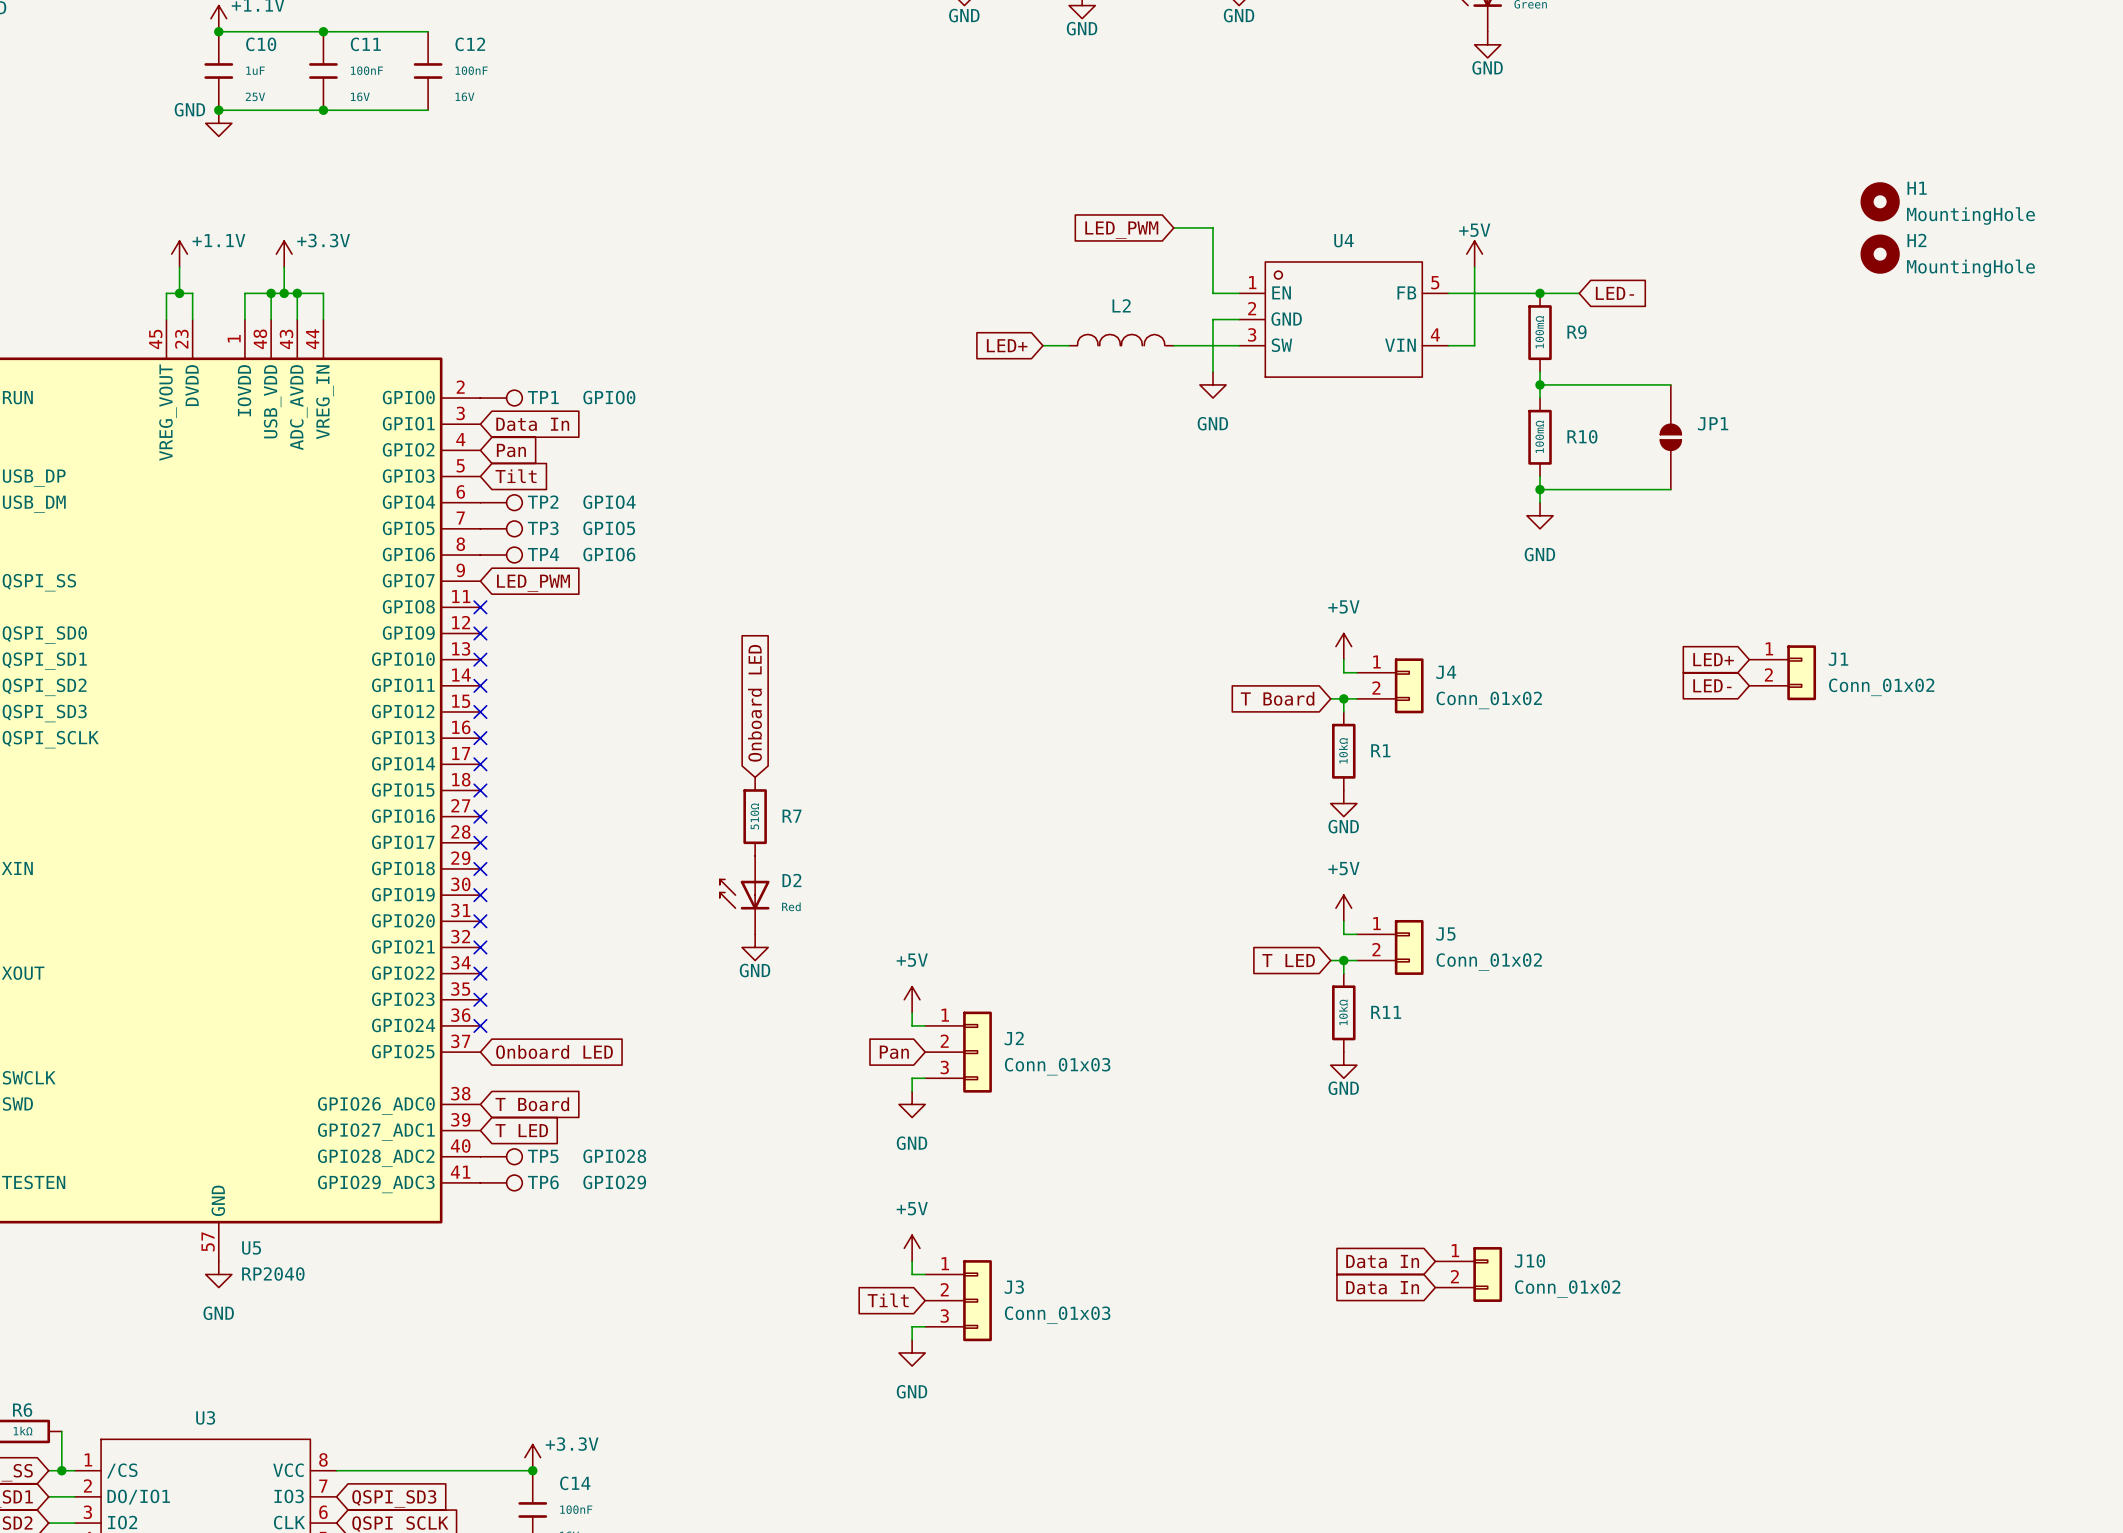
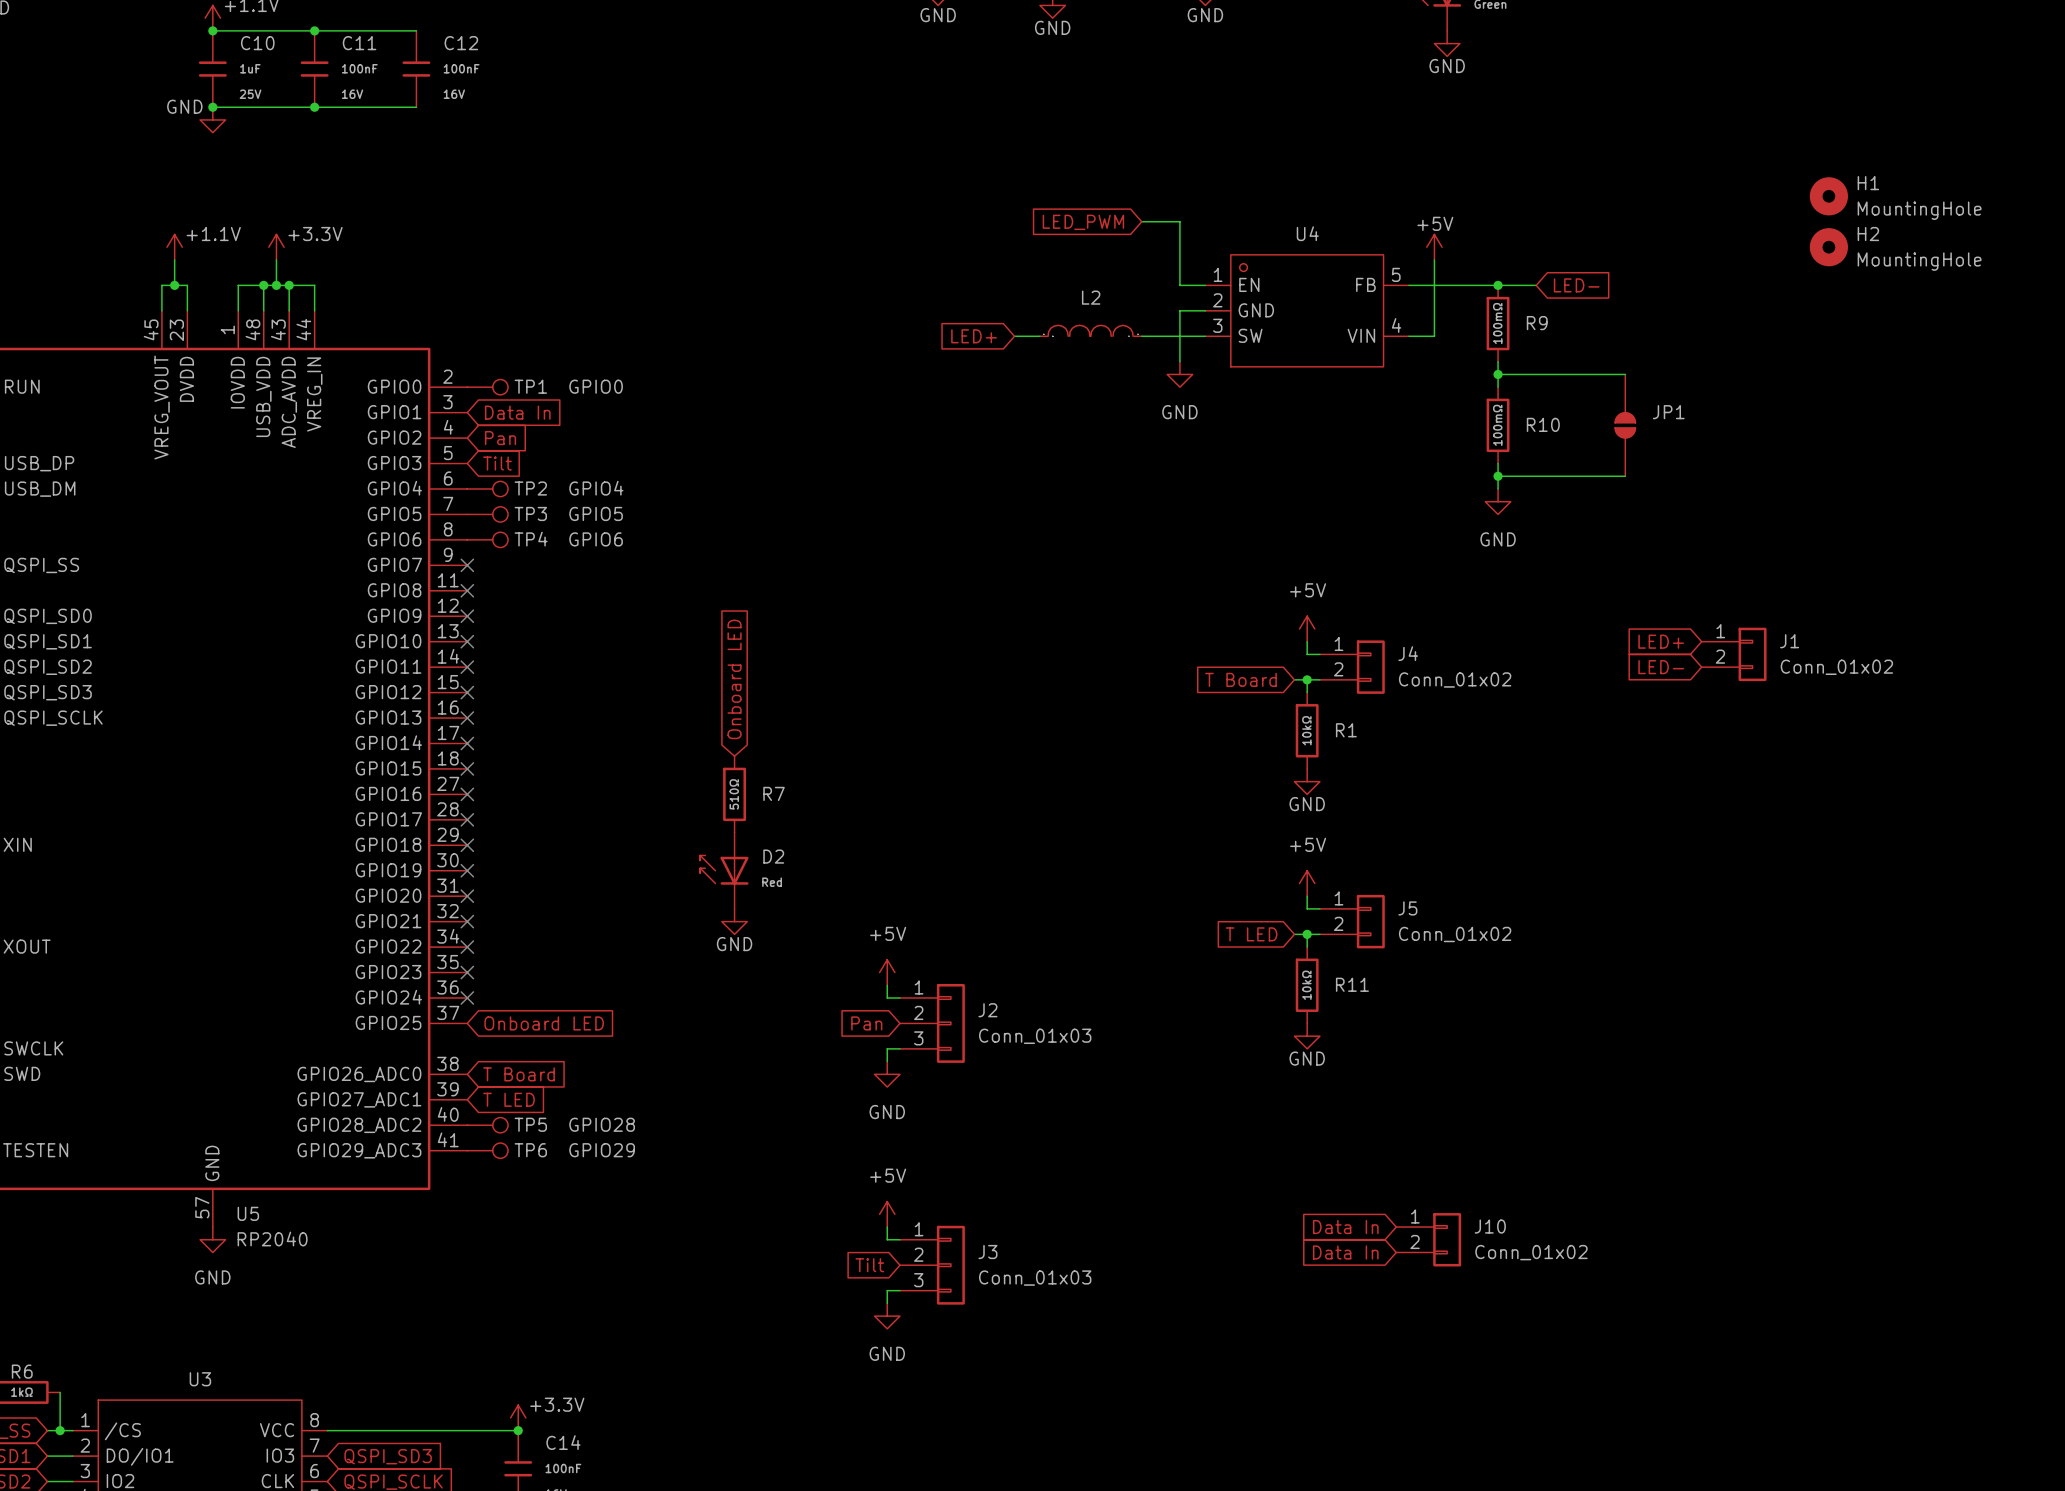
no-connect mark: none -> (467, 565)
global label: LED_PWM (533, 583) -> none

